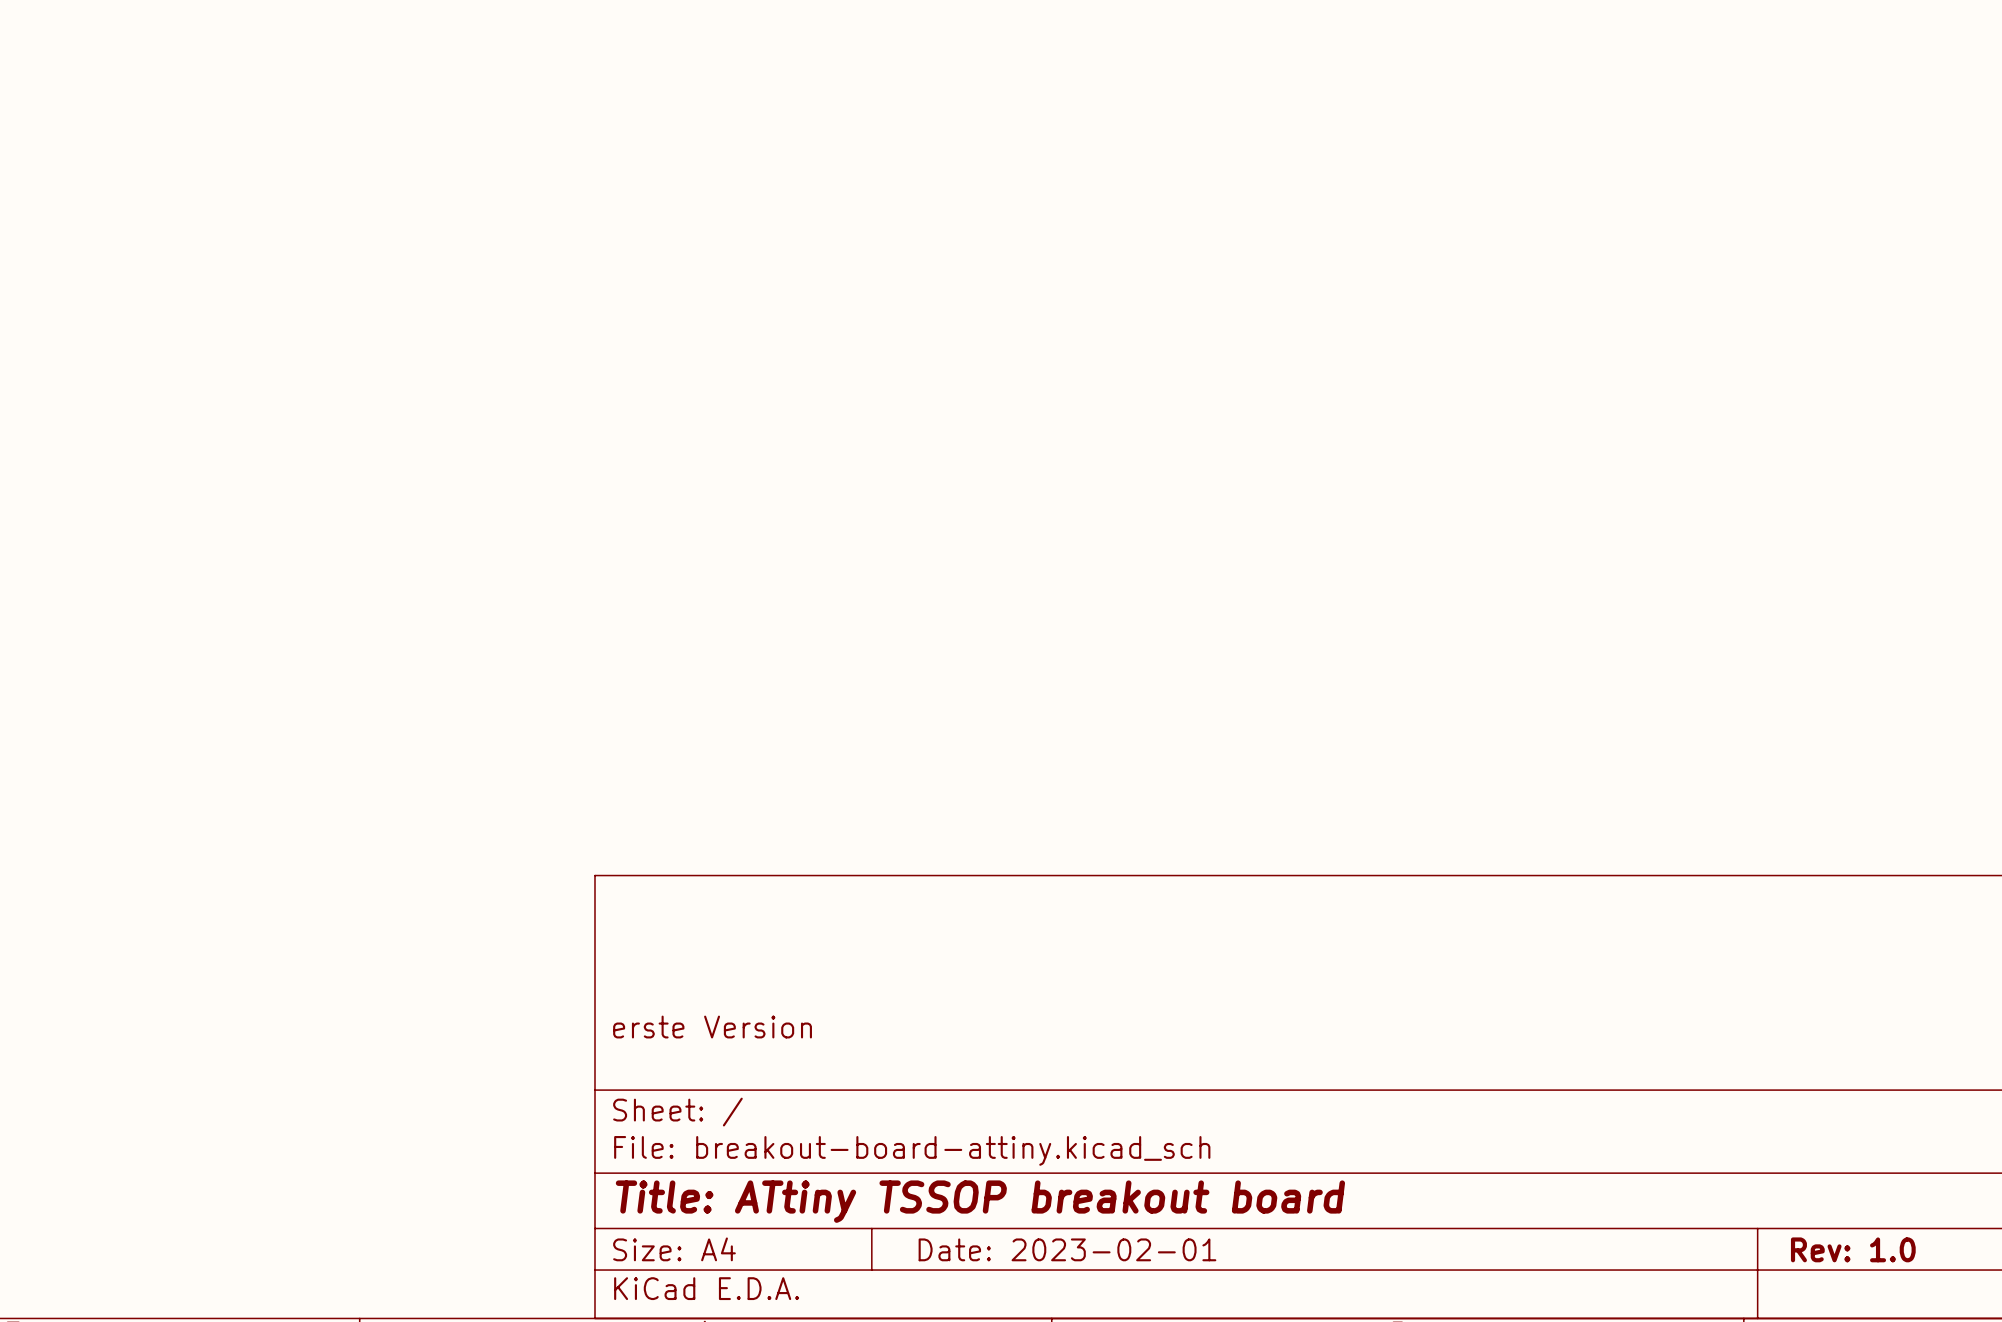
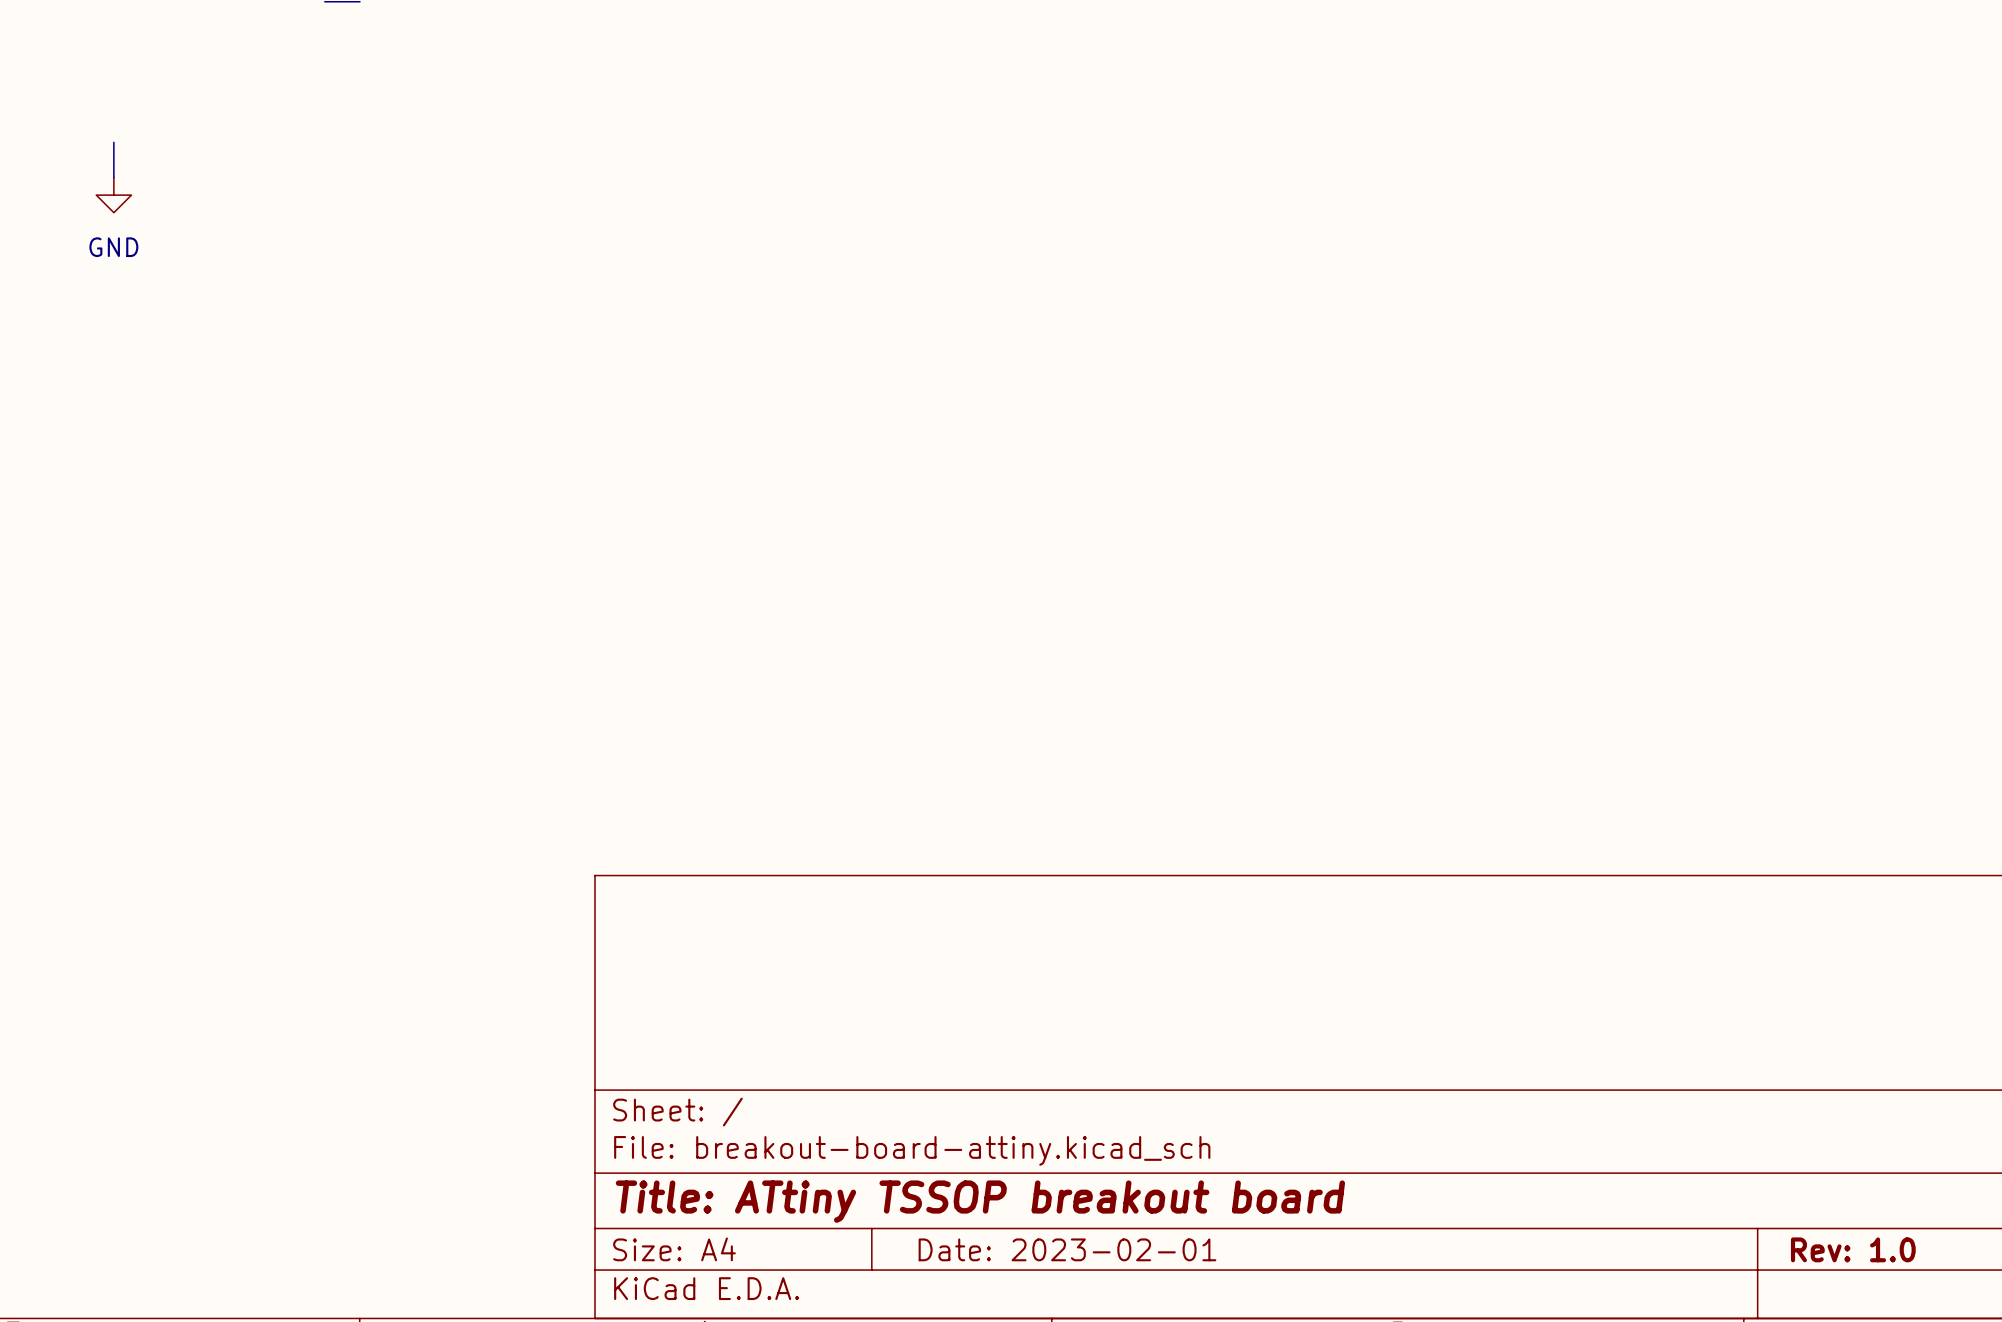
wire: none -> (324, 1) (359, 1)
wire: none -> (113, 142) (113, 177)
power symbol: none -> GND (113, 195)
title block: erste Version (712, 1027) -> none

